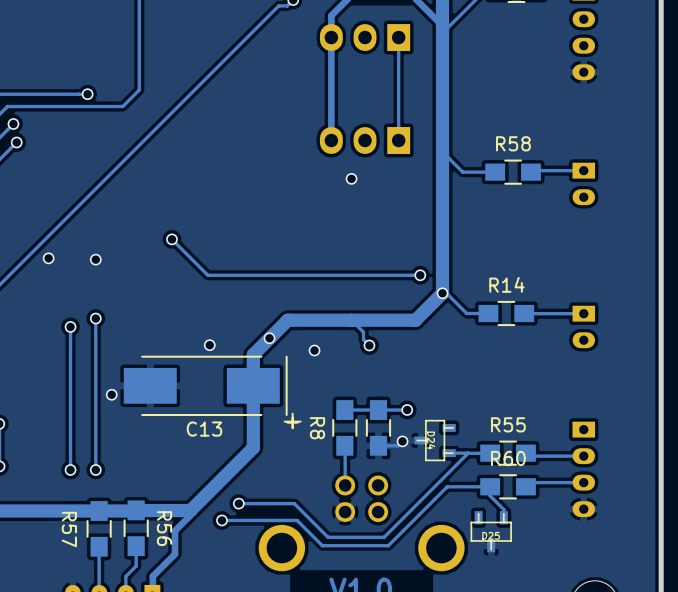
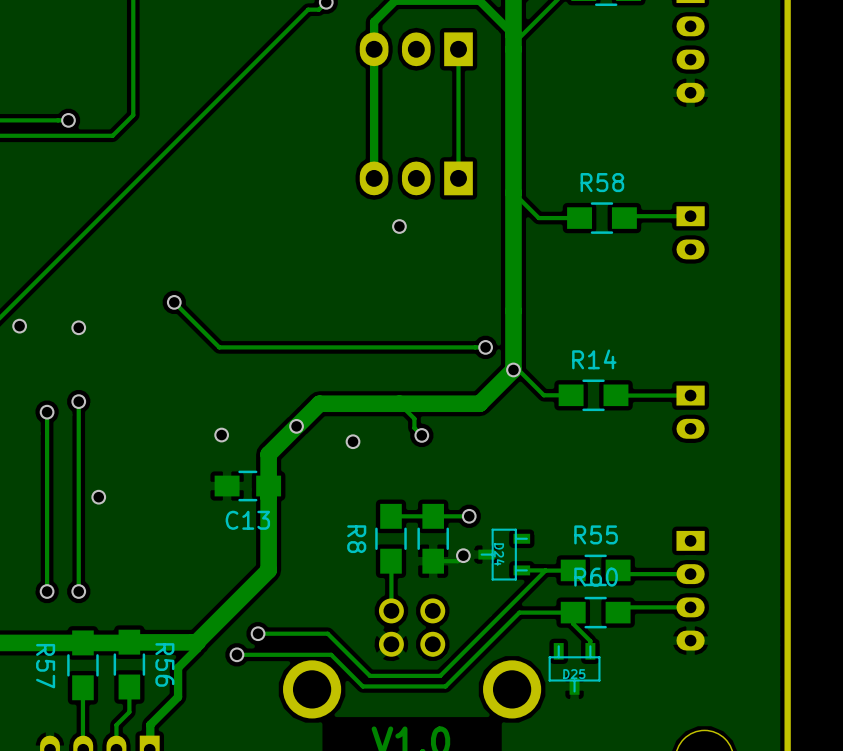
track: (270, 337) (253, 354) (253, 447) (190, 510) -> none
track: none -> (296, 426) (268, 454) (268, 570) (196, 642)
C13 footprint: [123, 355, 302, 430] -> [214, 470, 282, 502]

